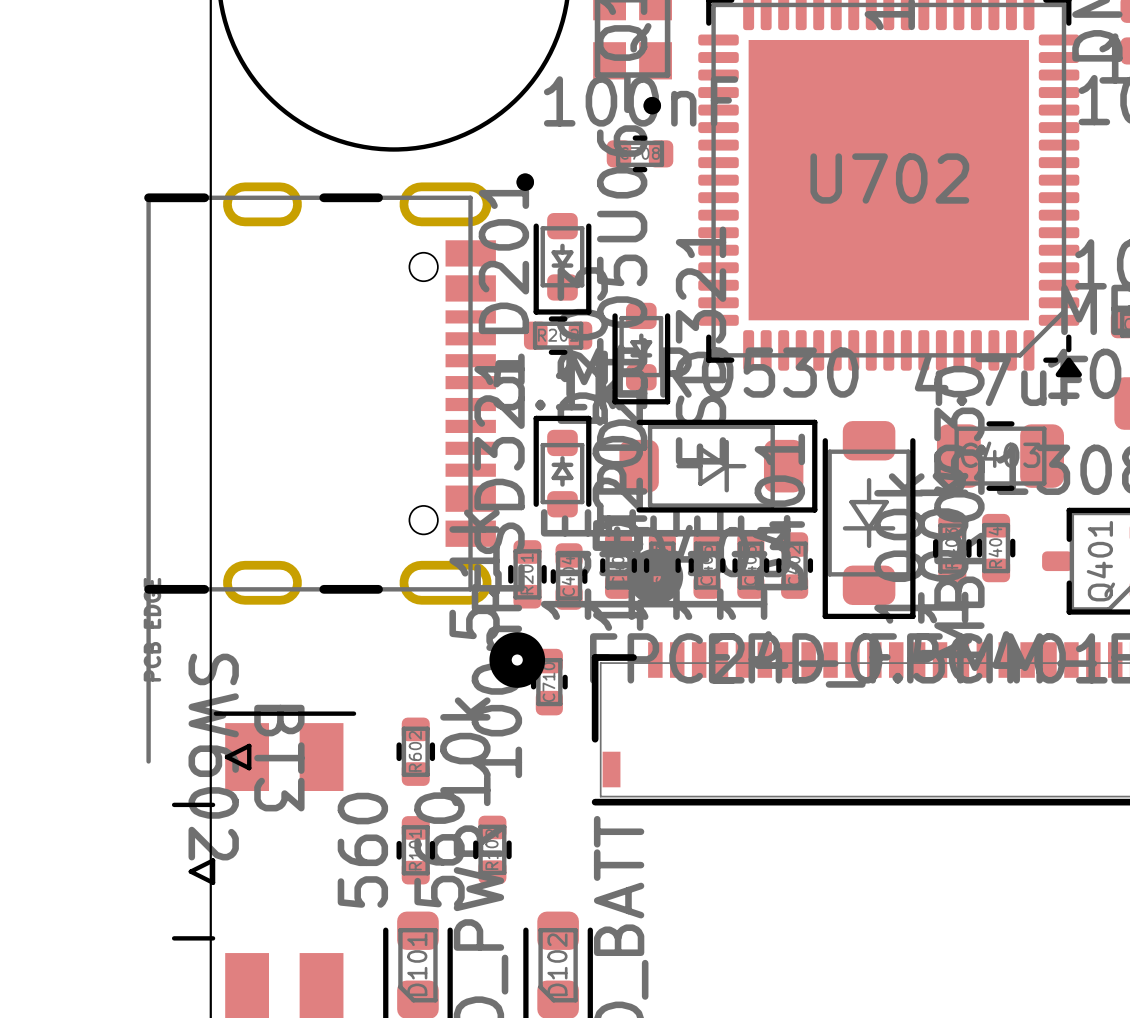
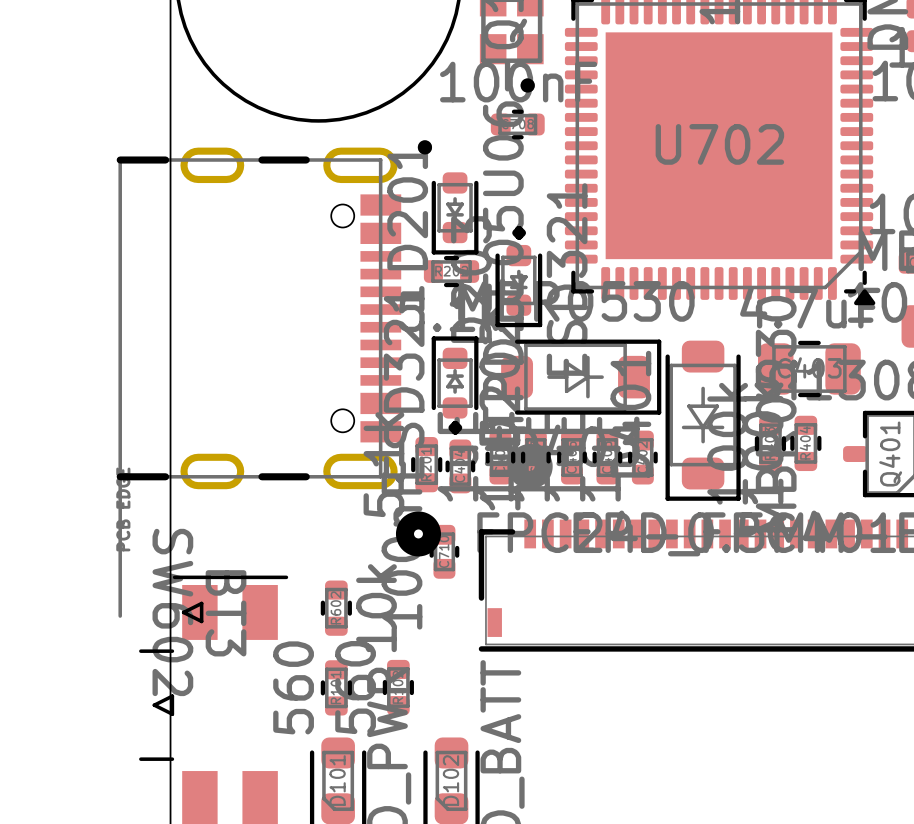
text: none -> . (519, 232)
text: none -> . (455, 427)

